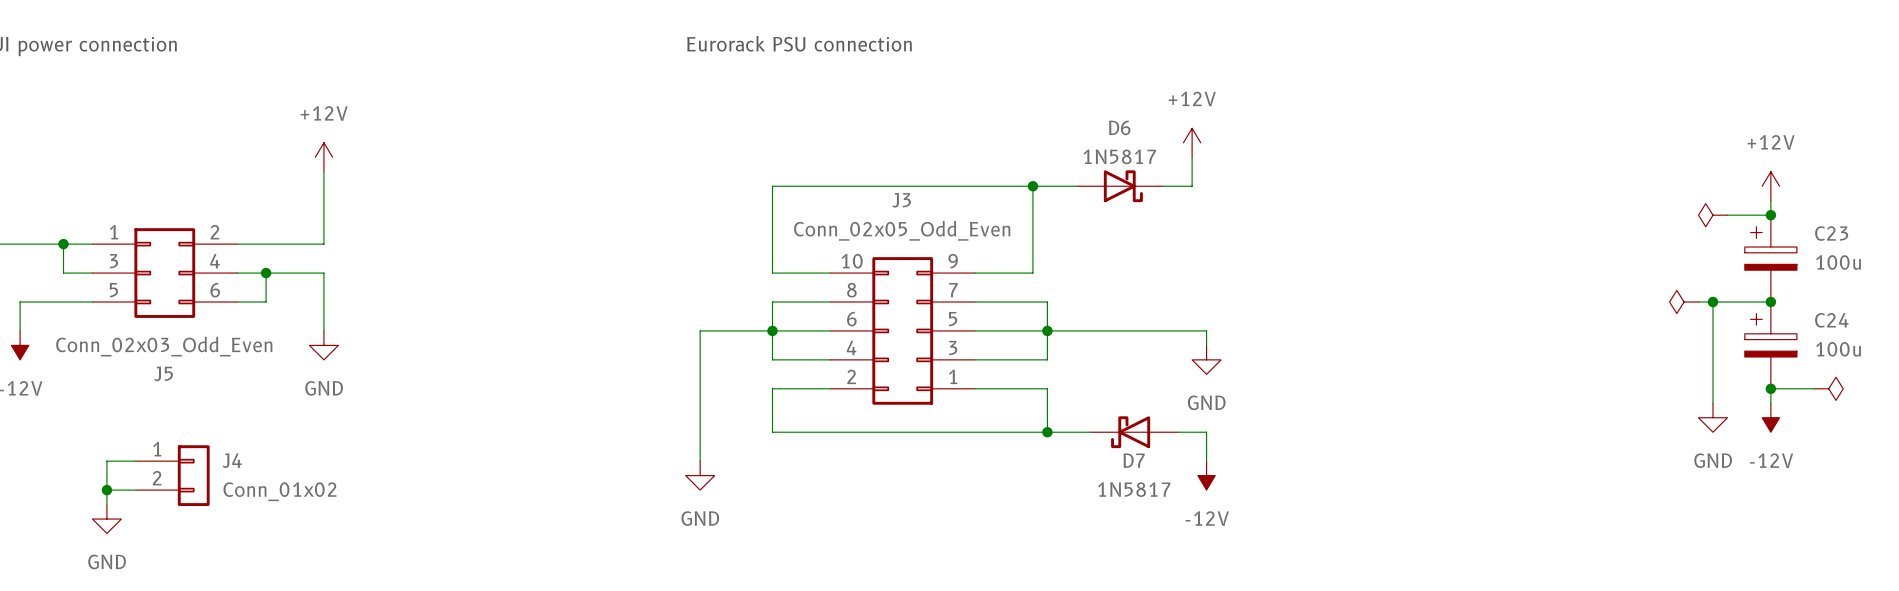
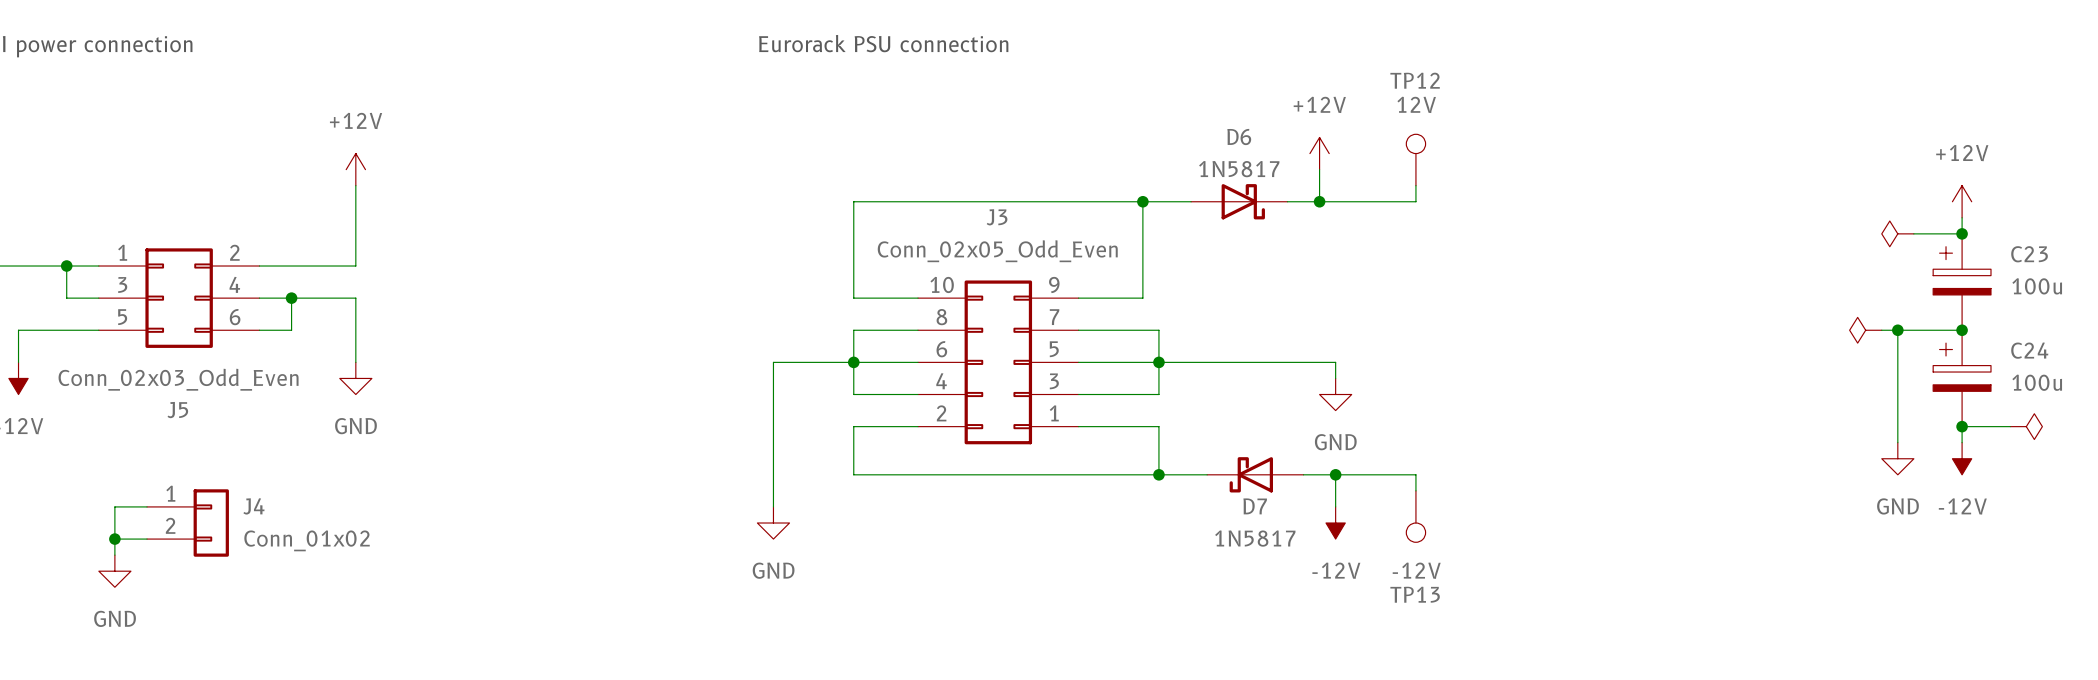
TP12: none -> 12V (1415, 159)
wire: none -> (1415, 185) (1415, 201) (1319, 201)
junction: none -> (1319, 201)
wire: none -> (1335, 474) (1415, 474) (1415, 490)
junction: none -> (1335, 474)
TP13: none -> -12V (1415, 516)

